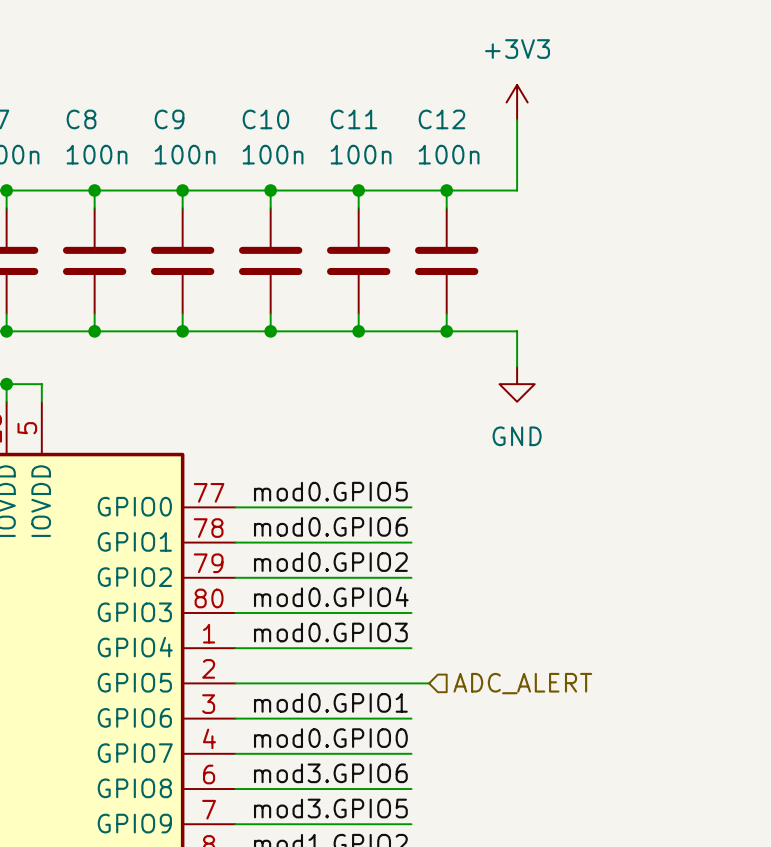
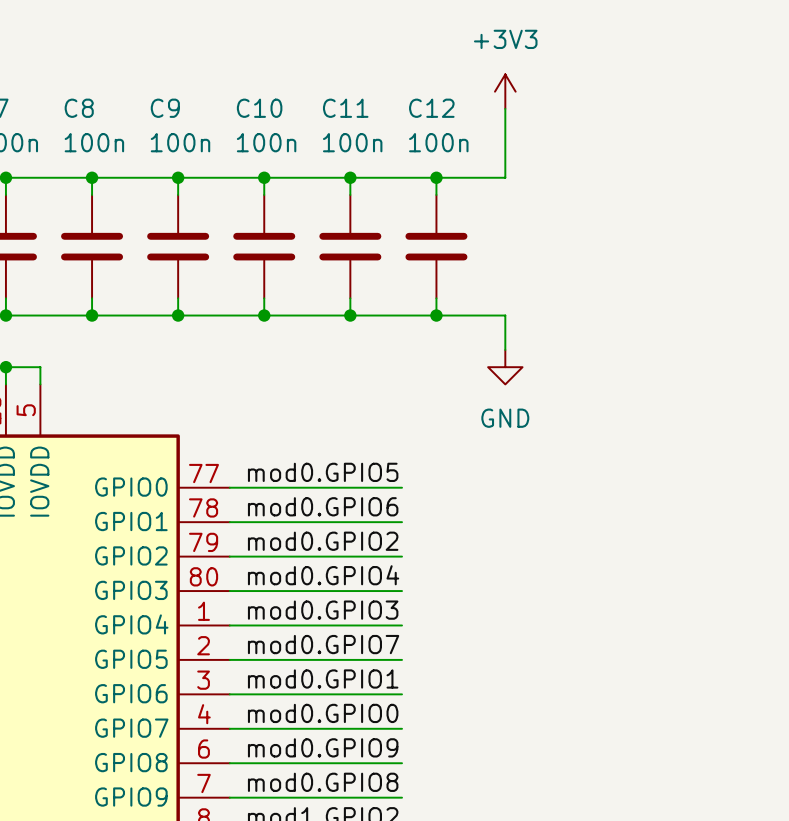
label: none -> mod0.GPIO7 (323, 644)
wire: (411, 683) (429, 683) -> none
hierarchical label: ADC_ALERT (522, 683) -> none
label: mod3.GPIO6 (330, 773) -> mod0.GPIO9 (323, 747)
label: mod3.GPIO5 (330, 808) -> mod0.GPIO8 (323, 782)

